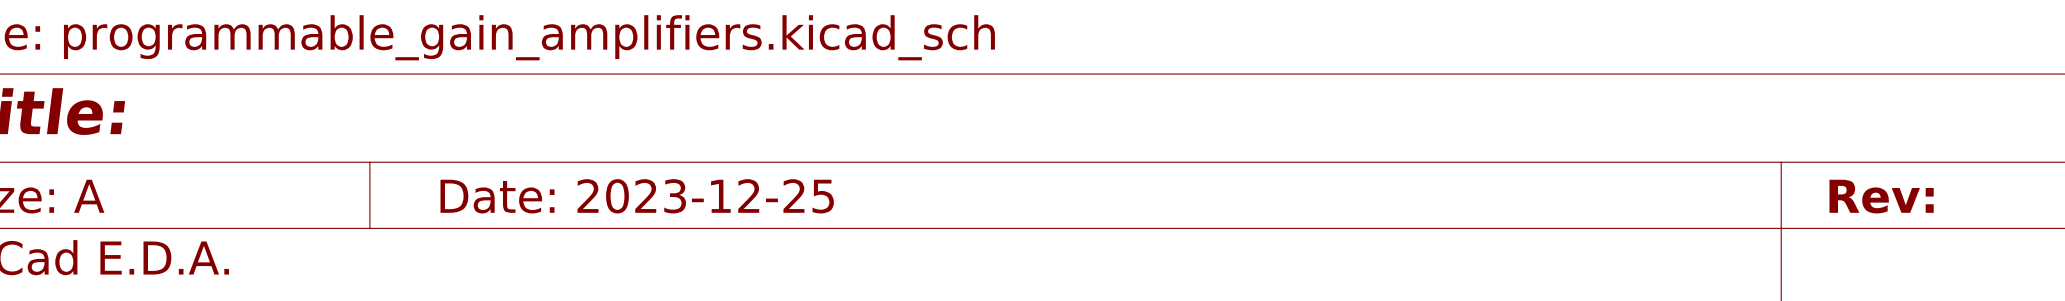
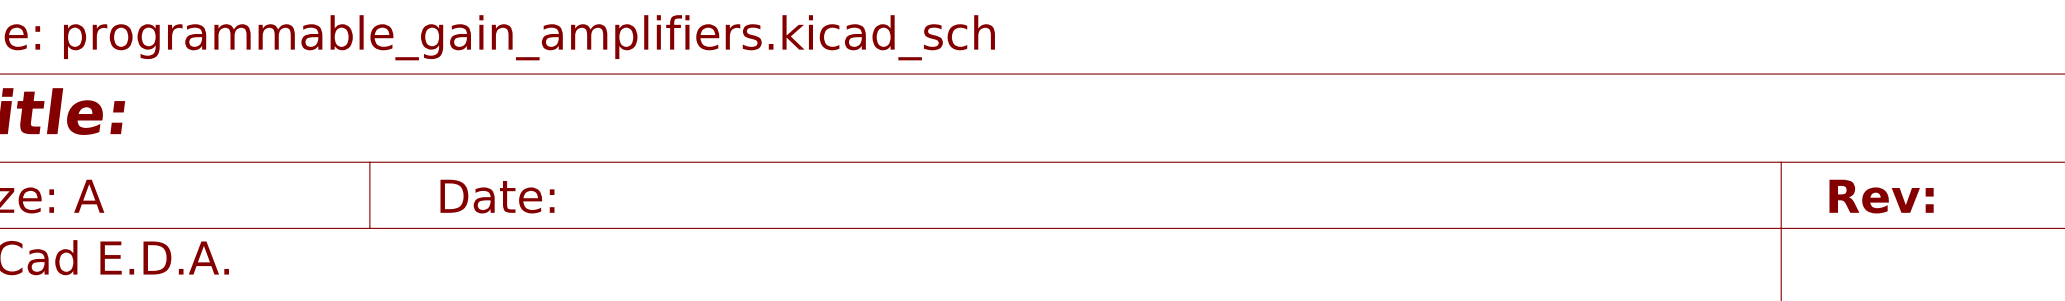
title block: Date: 2023-12-25 (637, 196) -> Date: (497, 196)

